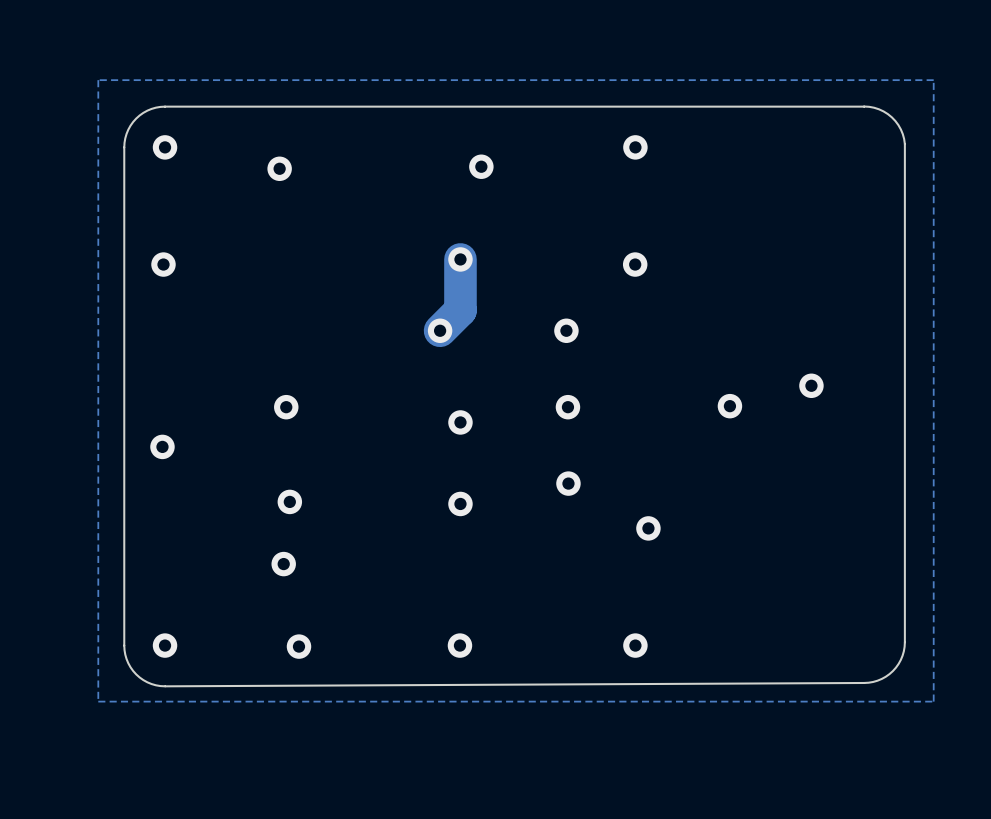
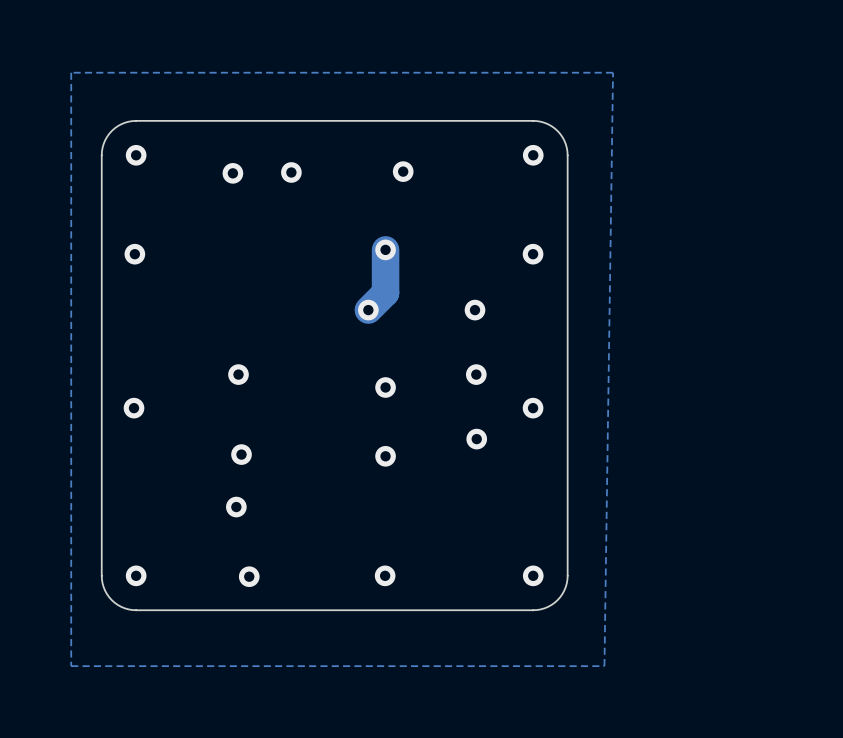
zone outline: (933, 80) (98, 80) (98, 701) (933, 701) (933, 80) -> (613, 72) (604, 666) (71, 666) (71, 72) (613, 72)
board edge: (635, 106) (869, 106) (887, 114) (900, 129) (904, 144) (904, 642) (902, 655) (895, 667) (881, 678) (864, 682) (165, 686) -> (533, 120) (544, 122) (554, 128) (562, 136) (567, 151) (567, 575) (565, 587) (560, 597) (548, 606) (533, 610) (136, 610)
via: none -> (291, 172)
via: (811, 385) -> none
via: (729, 406) -> none
via: none -> (533, 408)
via: (648, 528) -> none

